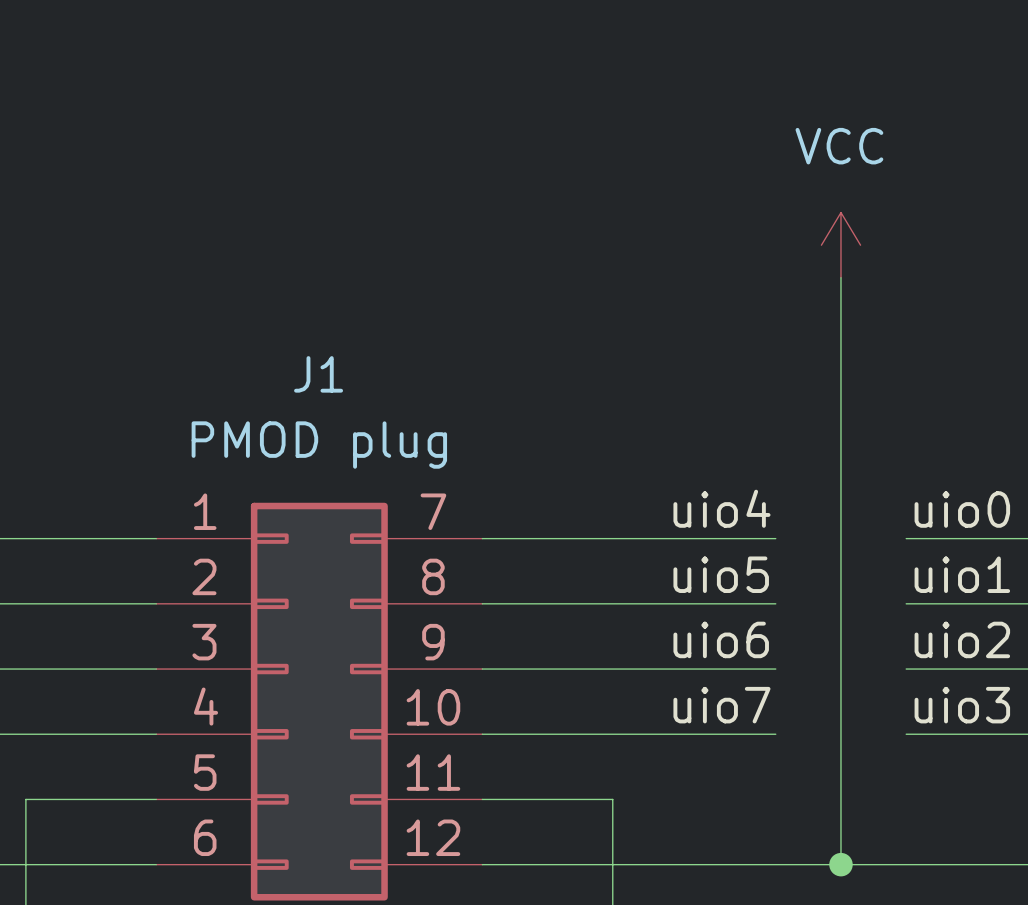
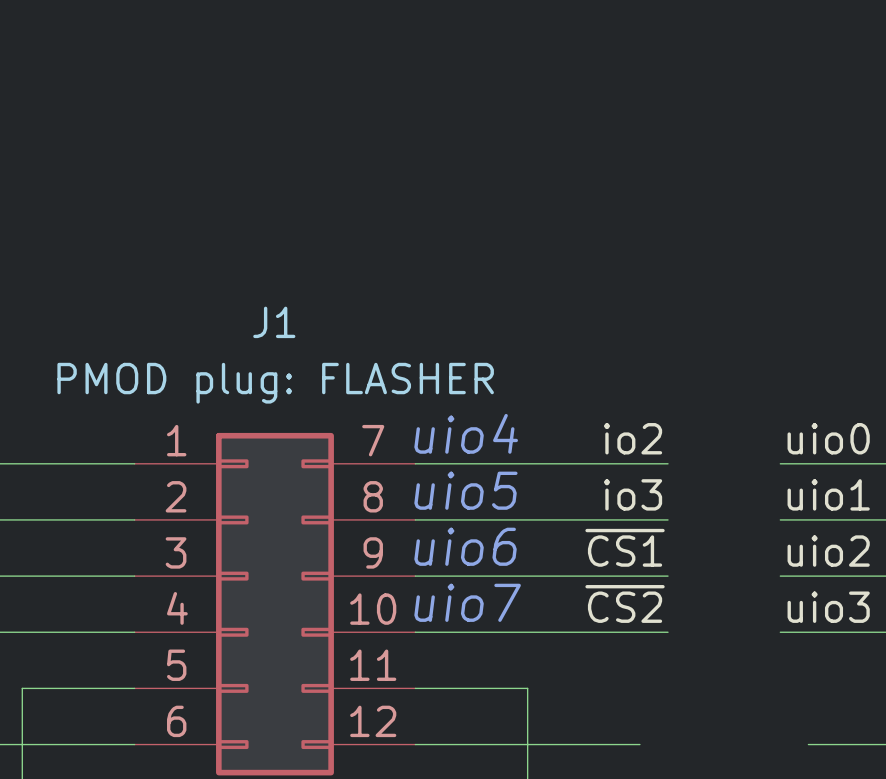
power symbol: VCC (840, 245) -> none
wire: (840, 277) (840, 864) -> none
J1 value: PMOD plug (319, 445) -> PMOD plug: FLASHER (275, 383)
text: none -> uio4 (466, 433)
label: uio4 (721, 508) -> io2 (633, 438)
text: none -> uio5 (465, 490)
label: uio5 (721, 574) -> io3 (633, 494)
text: none -> uio6 (465, 546)
label: uio6 (721, 639) -> ~{CS1} (625, 547)
text: none -> uio7 (467, 602)
label: uio7 (721, 705) -> ~{CS2} (625, 603)
wire: (743, 864) (938, 864) -> none
junction: (840, 864) -> none

